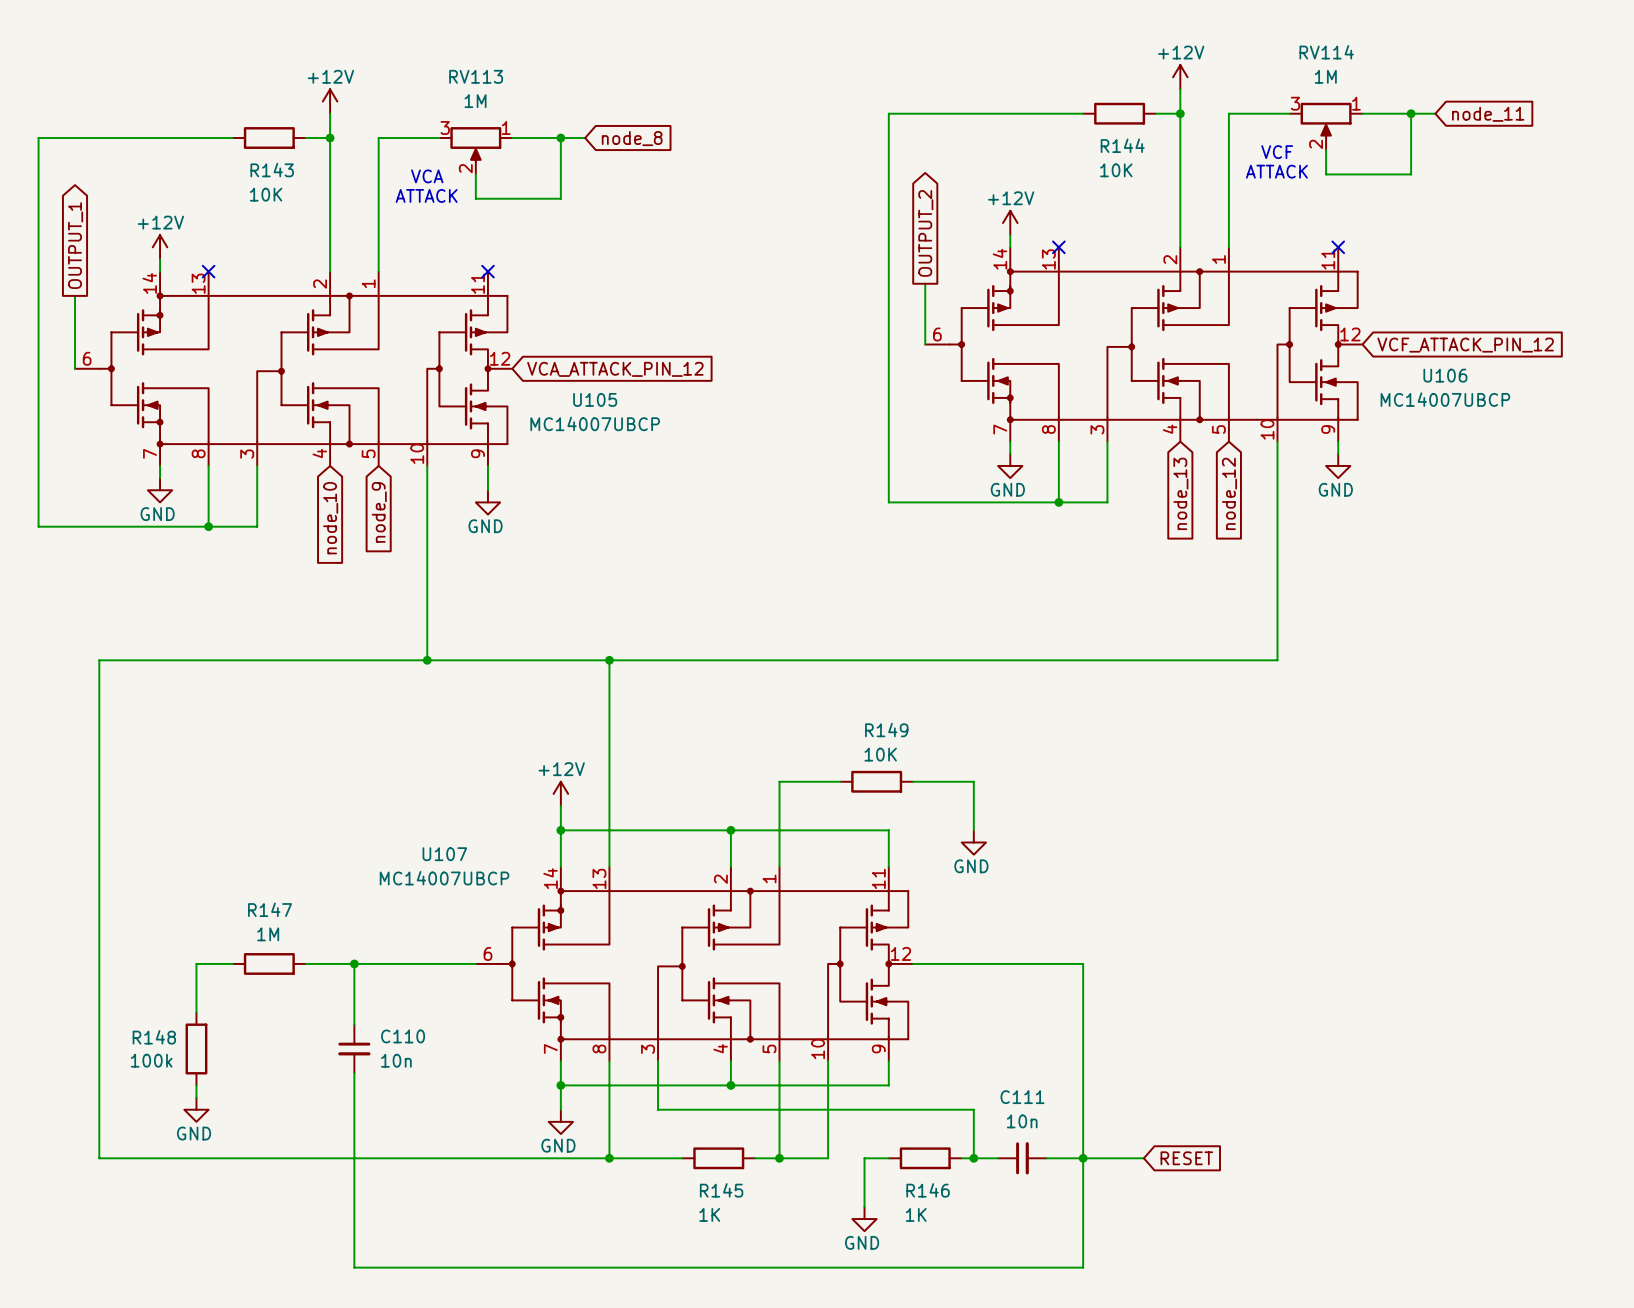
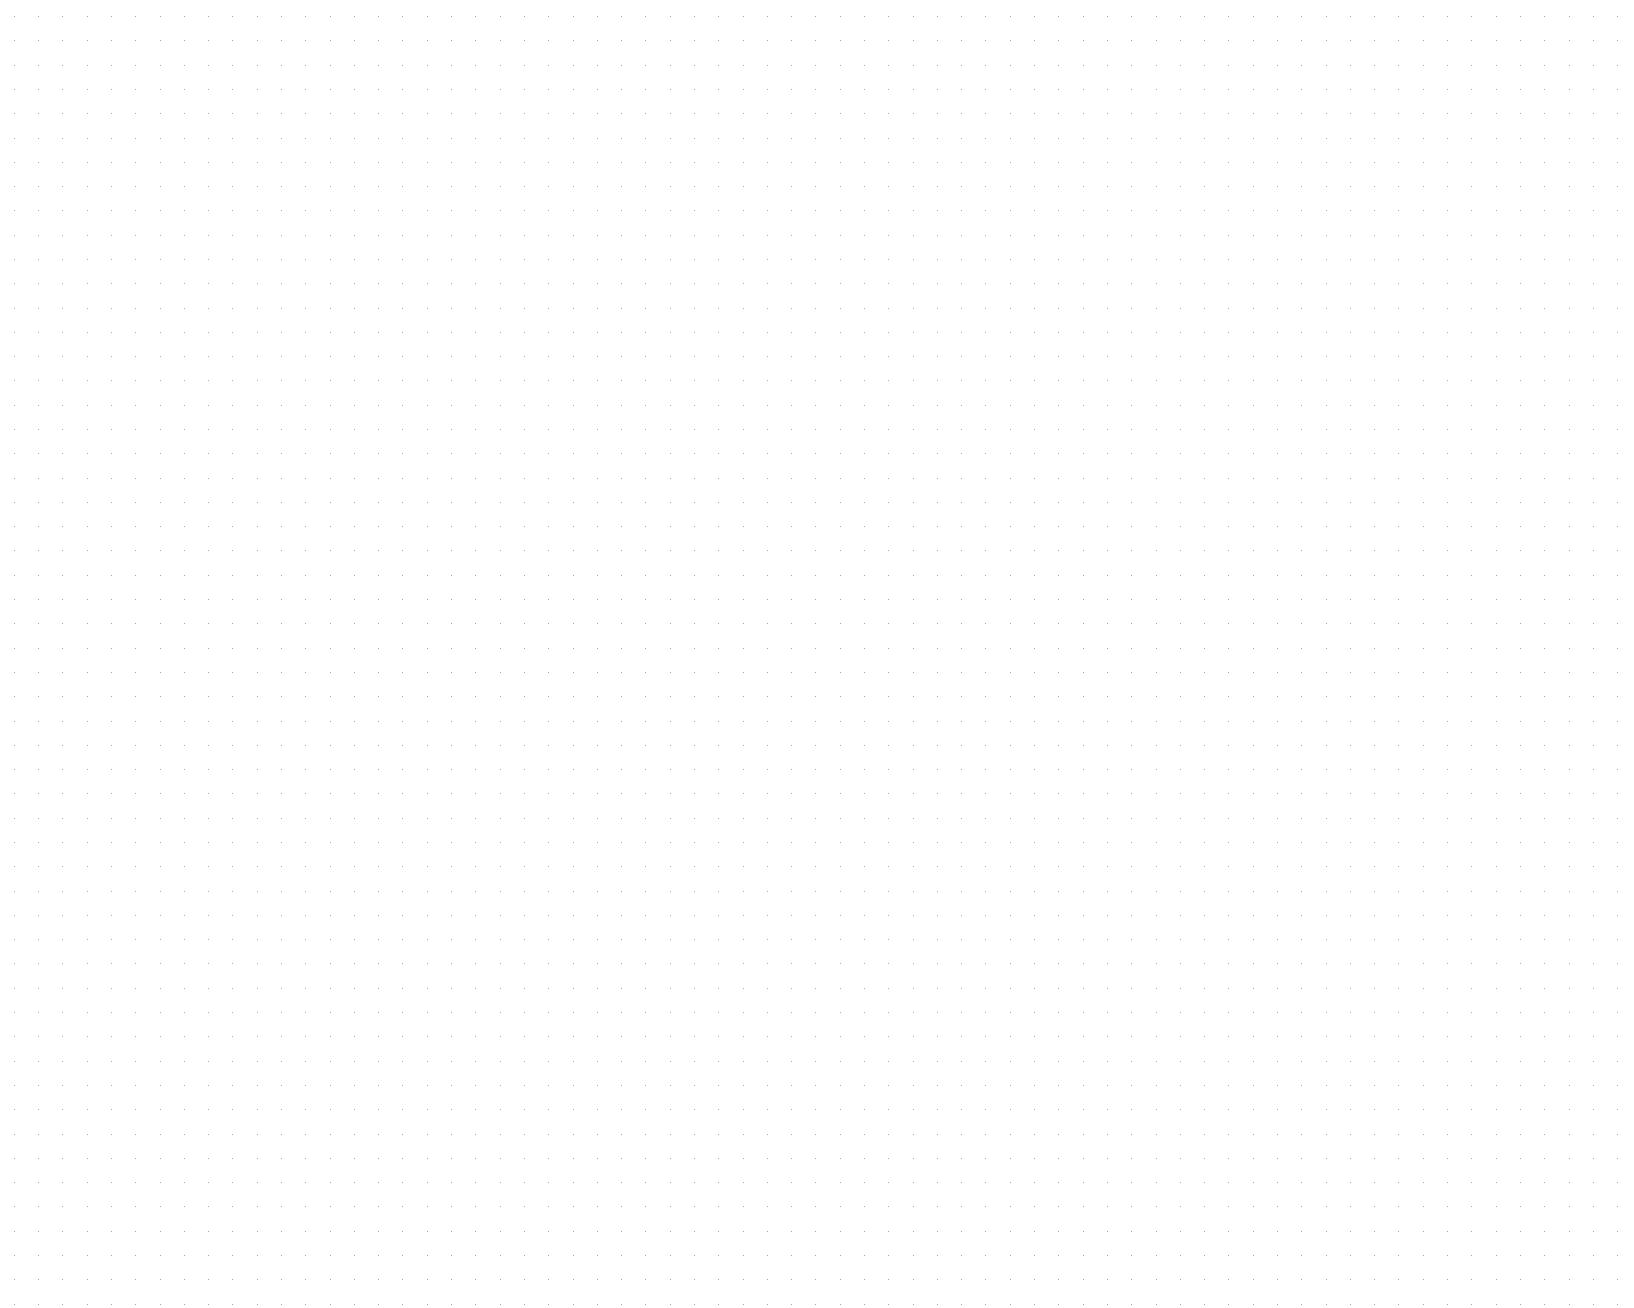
power symbol: +12V (1180, 77) -> none
wire: (1180, 89) (1180, 247) -> none
power symbol: +12V (330, 101) -> none
wire: (330, 113) (330, 271) -> none
wire: (1083, 113) (888, 113) (888, 502) (1107, 502) (1107, 441) -> none
R144: 10K (1119, 113) -> none
wire: (1156, 113) (1180, 113) -> none
junction: (1180, 113) -> none
wire: (1289, 113) (1228, 113) (1228, 247) -> none
wire: (1362, 113) (1435, 113) -> none
wire: (1411, 113) (1411, 174) (1326, 174) (1326, 150) -> none
junction: (1411, 113) -> none
global label: node_11 (1488, 114) -> none
RV114: 1M (1326, 126) -> none
wire: (232, 138) (38, 138) (38, 526) (257, 526) (257, 465) -> none
R143: 10K (269, 138) -> none
wire: (305, 138) (330, 138) -> none
junction: (330, 138) -> none
wire: (439, 138) (378, 138) (378, 271) -> none
wire: (512, 138) (585, 138) -> none
wire: (560, 138) (560, 198) (475, 198) (475, 174) -> none
junction: (560, 138) -> none
global label: node_8 (632, 138) -> none
RV113: 1M (475, 150) -> none
text: VCF (1277, 152) -> none
text: ATTACK (1276, 171) -> none
text: VCA (427, 176) -> none
text: ATTACK (426, 195) -> none
power symbol: +12V (1010, 223) -> none
global label: OUTPUT_2 (925, 233) -> none
wire: (1010, 235) (1010, 247) -> none
global label: OUTPUT_1 (75, 245) -> none
power symbol: +12V (160, 247) -> none
no-connect mark: (1058, 247) -> none
no-connect mark: (1338, 247) -> none
wire: (160, 259) (160, 271) -> none
no-connect mark: (208, 271) -> none
no-connect mark: (487, 271) -> none
wire: (925, 283) (925, 344) -> none
wire: (75, 295) (75, 368) -> none
U106: MC14007UBCP (1143, 344) -> none
global label: VCF_ATTACK_PIN_12 (1465, 345) -> none
U105: MC14007UBCP (293, 368) -> none
global label: VCA_ATTACK_PIN_12 (615, 369) -> none
wire: (1010, 441) (1010, 453) -> none
wire: (1058, 441) (1058, 502) -> none
wire: (1277, 441) (1277, 660) (99, 660) (99, 1158) (682, 1158) -> none
wire: (1338, 441) (1338, 453) -> none
wire: (160, 465) (160, 478) -> none
wire: (208, 465) (208, 526) -> none
wire: (427, 465) (427, 660) -> none
wire: (487, 465) (487, 490) -> none
power symbol: GND (1010, 465) -> none
power symbol: GND (1338, 465) -> none
power symbol: GND (160, 490) -> none
global label: node_13 (1180, 493) -> none
global label: node_12 (1229, 493) -> none
power symbol: GND (487, 502) -> none
junction: (1058, 502) -> none
global label: node_9 (379, 512) -> none
global label: node_10 (330, 518) -> none
junction: (208, 526) -> none
junction: (427, 660) -> none
wire: (609, 660) (609, 866) -> none
junction: (609, 660) -> none
wire: (840, 781) (779, 781) (779, 866) -> none
R149: 10K (876, 781) -> none
wire: (913, 781) (973, 781) (973, 830) -> none
power symbol: +12V (560, 793) -> none
wire: (560, 806) (560, 866) -> none
wire: (560, 830) (888, 830) (888, 866) -> none
junction: (560, 830) -> none
wire: (730, 830) (730, 866) -> none
junction: (730, 830) -> none
power symbol: GND (973, 842) -> none
wire: (232, 963) (196, 963) (196, 1012) -> none
R147: 1M (269, 963) -> none
wire: (305, 963) (475, 963) -> none
wire: (354, 963) (354, 1024) -> none
junction: (354, 963) -> none
U107: MC14007UBCP (694, 963) -> none
wire: (913, 963) (1083, 963) (1083, 1267) (354, 1267) (354, 1073) -> none
R148: 100k (196, 1048) -> none
C110: 10n (354, 1048) -> none
wire: (560, 1061) (560, 1109) -> none
wire: (609, 1061) (609, 1158) -> none
wire: (658, 1061) (658, 1109) (973, 1109) (973, 1158) -> none
wire: (730, 1061) (730, 1085) -> none
wire: (779, 1061) (779, 1158) -> none
wire: (828, 1061) (828, 1158) (755, 1158) -> none
wire: (888, 1061) (888, 1085) (560, 1085) -> none
wire: (196, 1085) (196, 1097) -> none
junction: (560, 1085) -> none
junction: (730, 1085) -> none
power symbol: GND (196, 1109) -> none
power symbol: GND (560, 1121) -> none
junction: (609, 1158) -> none
R145: 1K (718, 1158) -> none
junction: (779, 1158) -> none
wire: (888, 1158) (864, 1158) (864, 1206) -> none
R146: 1K (925, 1158) -> none
wire: (961, 1158) (998, 1158) -> none
junction: (973, 1158) -> none
C111: 10n (1022, 1158) -> none
wire: (1046, 1158) (1143, 1158) -> none
junction: (1083, 1158) -> none
global label: RESET (1186, 1158) -> none
power symbol: GND (864, 1219) -> none

